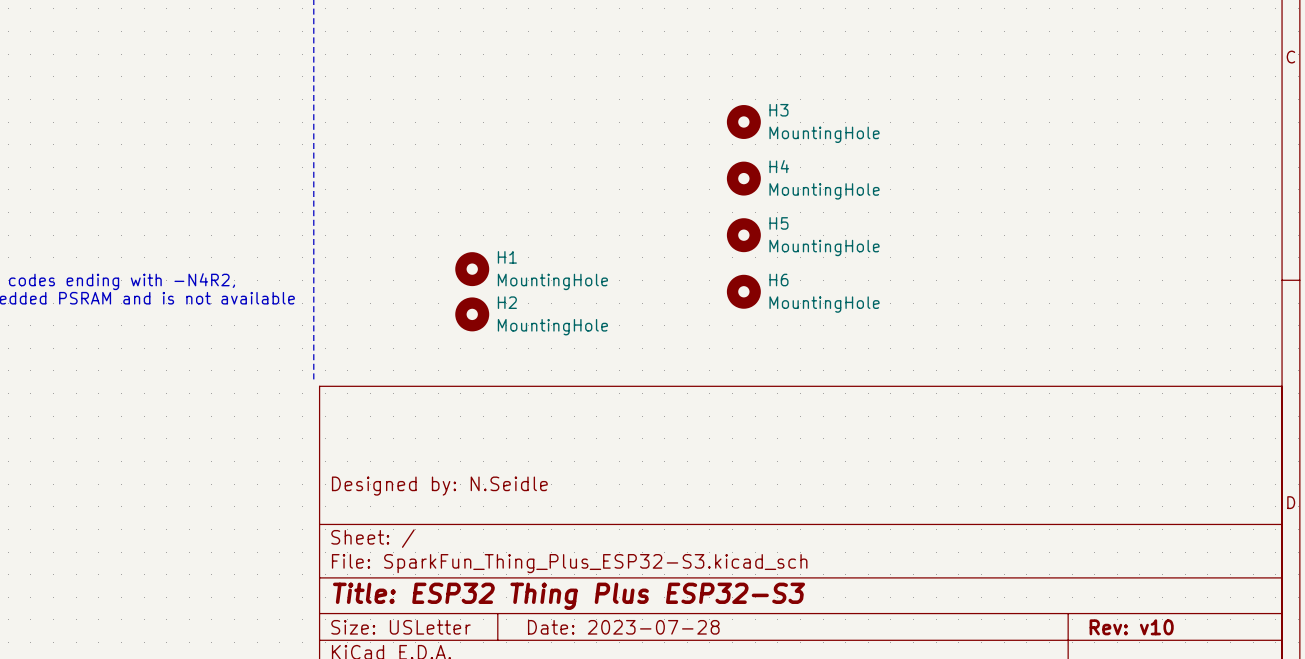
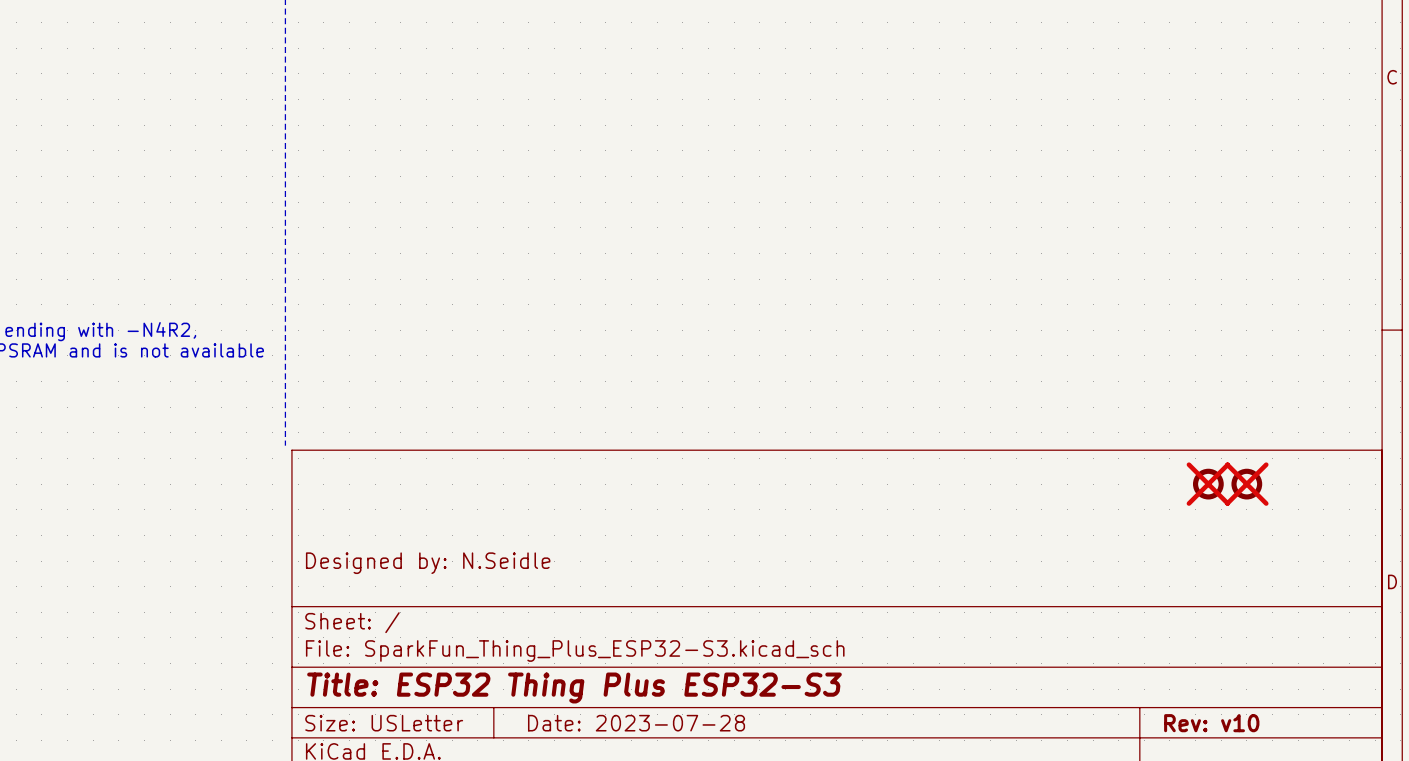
H3: MountingHole (743, 122) -> none
H4: MountingHole (743, 178) -> none
H5: MountingHole (743, 235) -> none
H1: MountingHole (472, 269) -> none
H6: MountingHole (743, 291) -> none
H2: MountingHole (472, 314) -> none
part: none -> (1208, 484)
part: none -> (1246, 484)

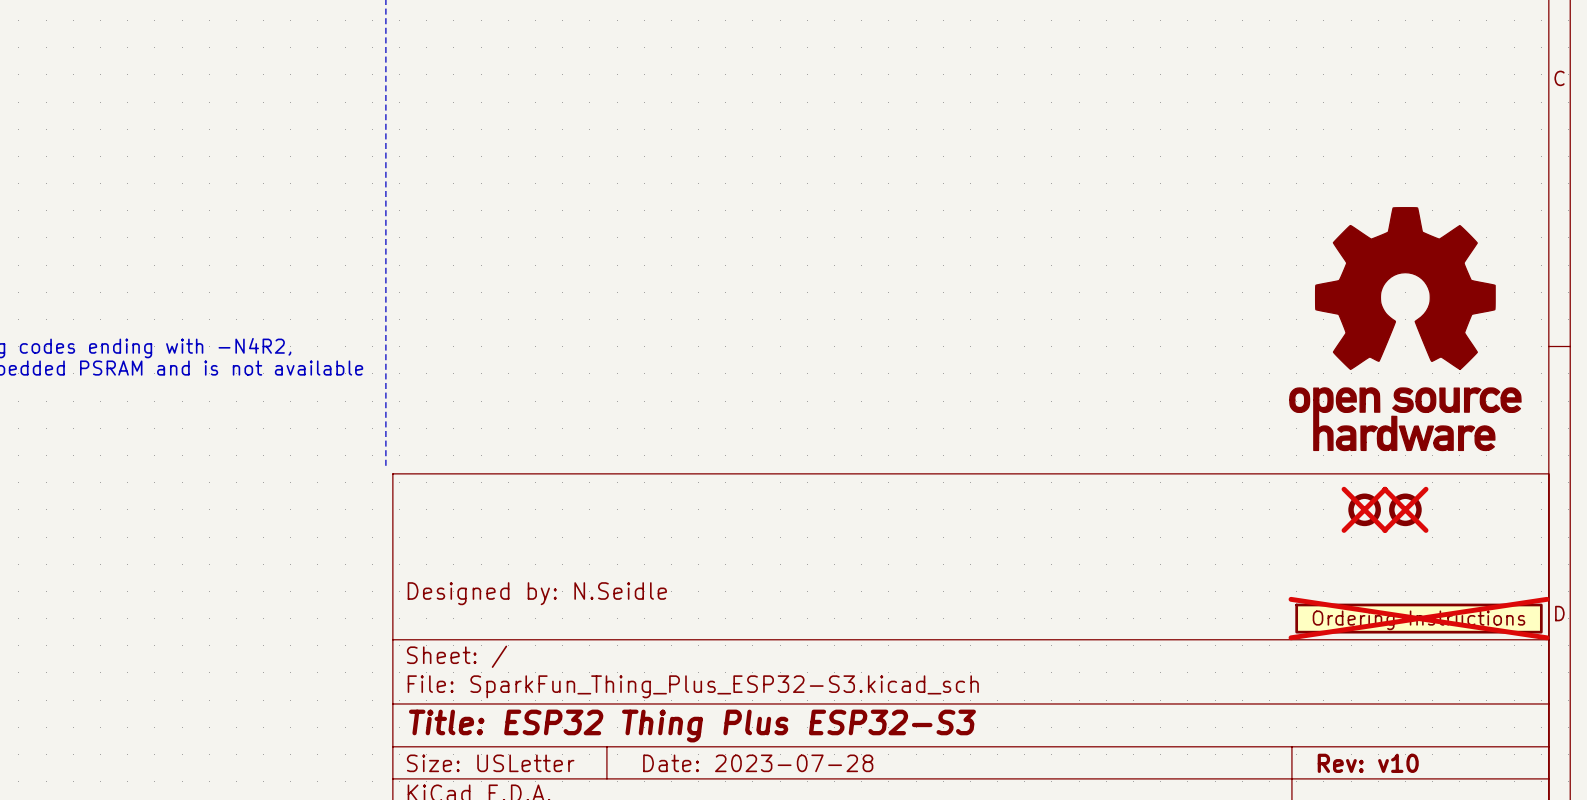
part: none -> (1405, 329)
part: none -> (1419, 618)

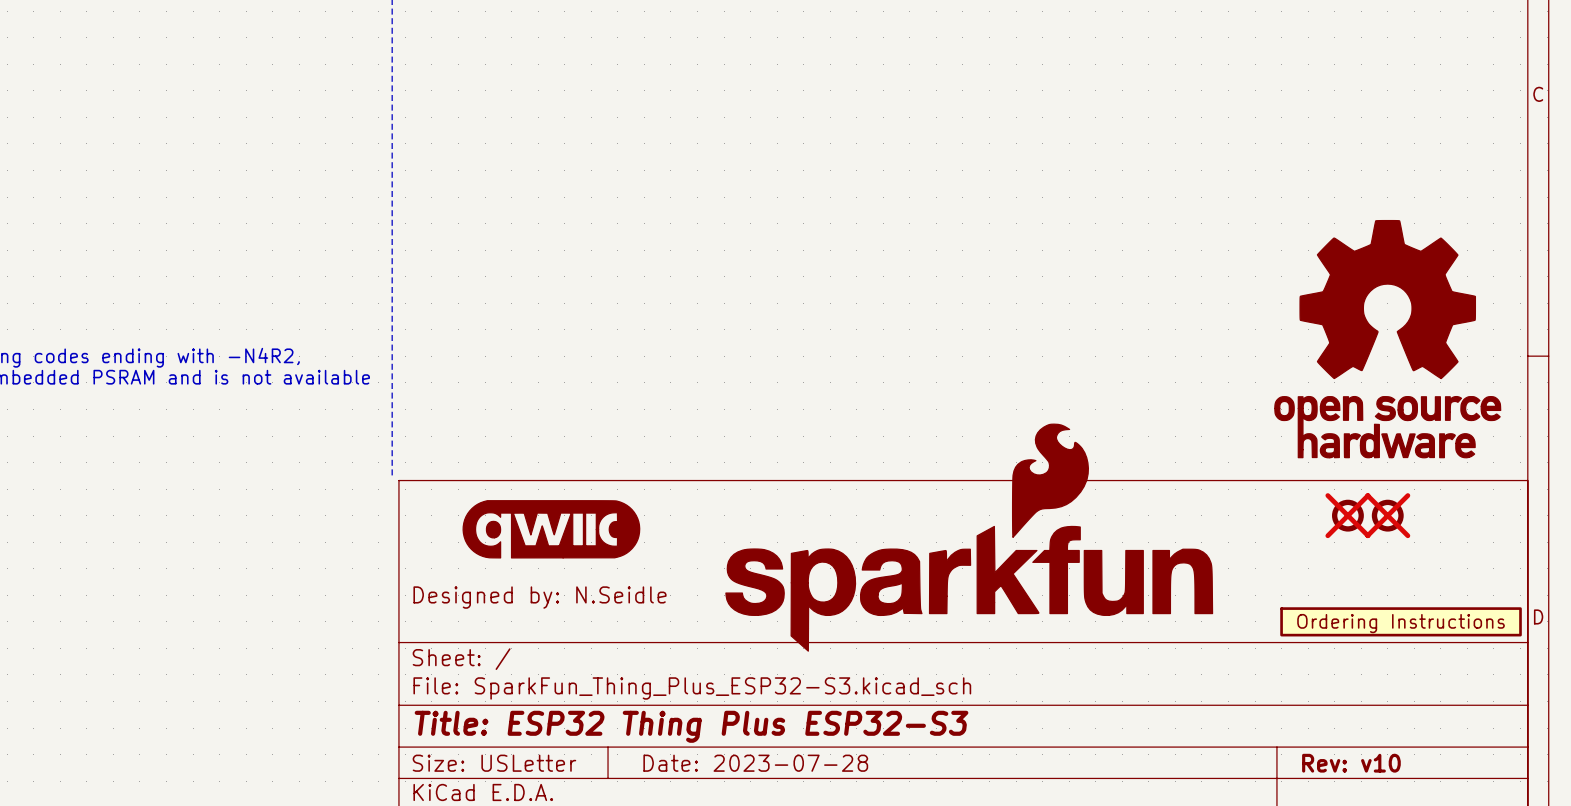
part: none -> (551, 529)
part: none -> (969, 537)
part do-not-place cross: (1419, 618) -> none

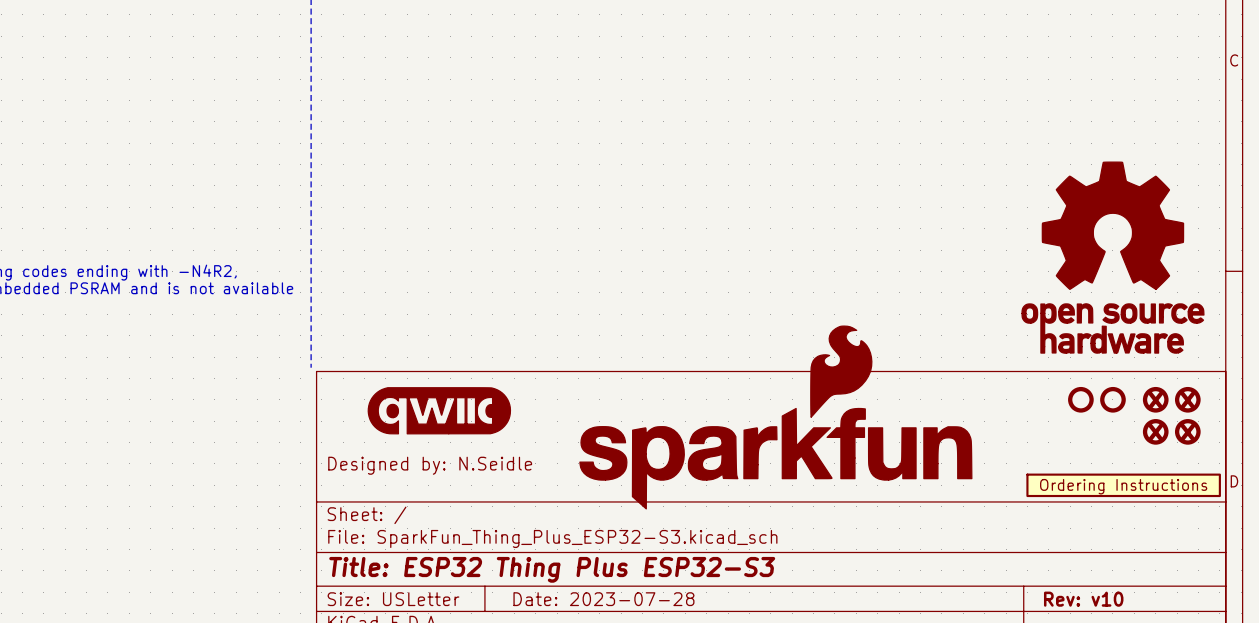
part do-not-place cross: (1347, 515) -> none
part do-not-place cross: (1387, 515) -> none
part: none -> (1155, 399)
part: none -> (1187, 399)
part: none -> (1155, 431)
part: none -> (1187, 431)

